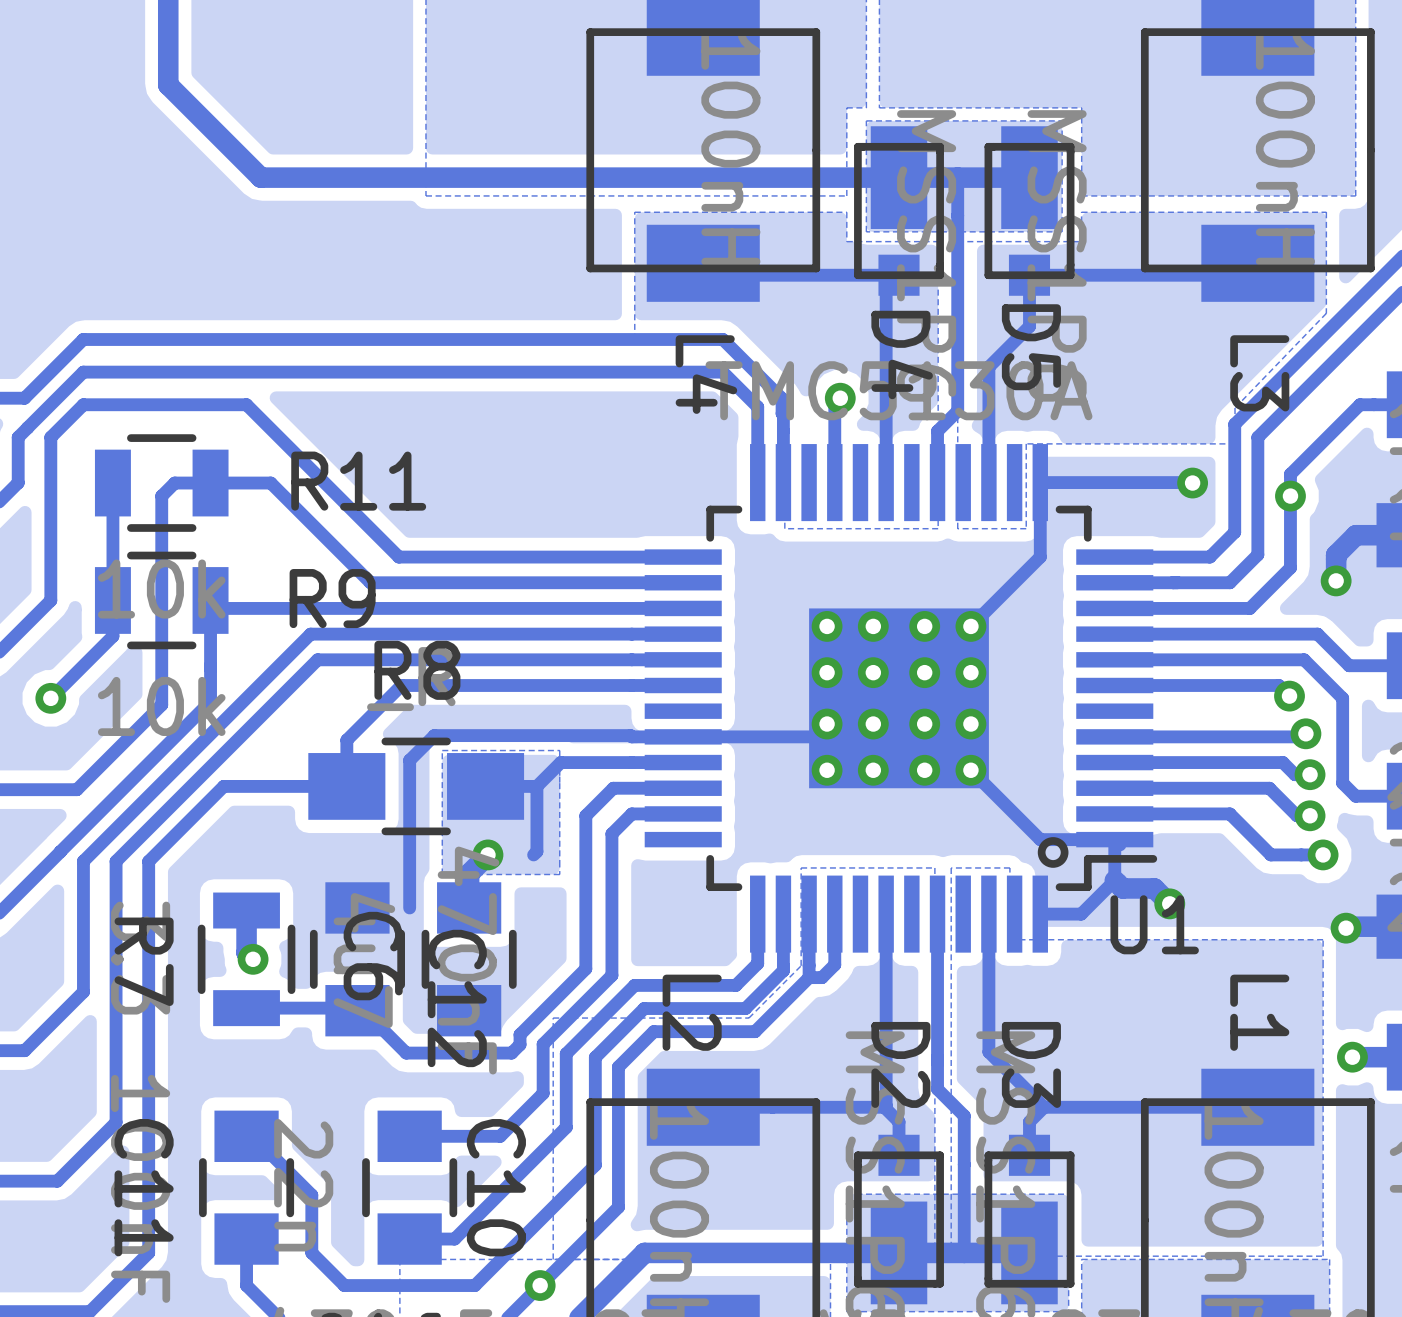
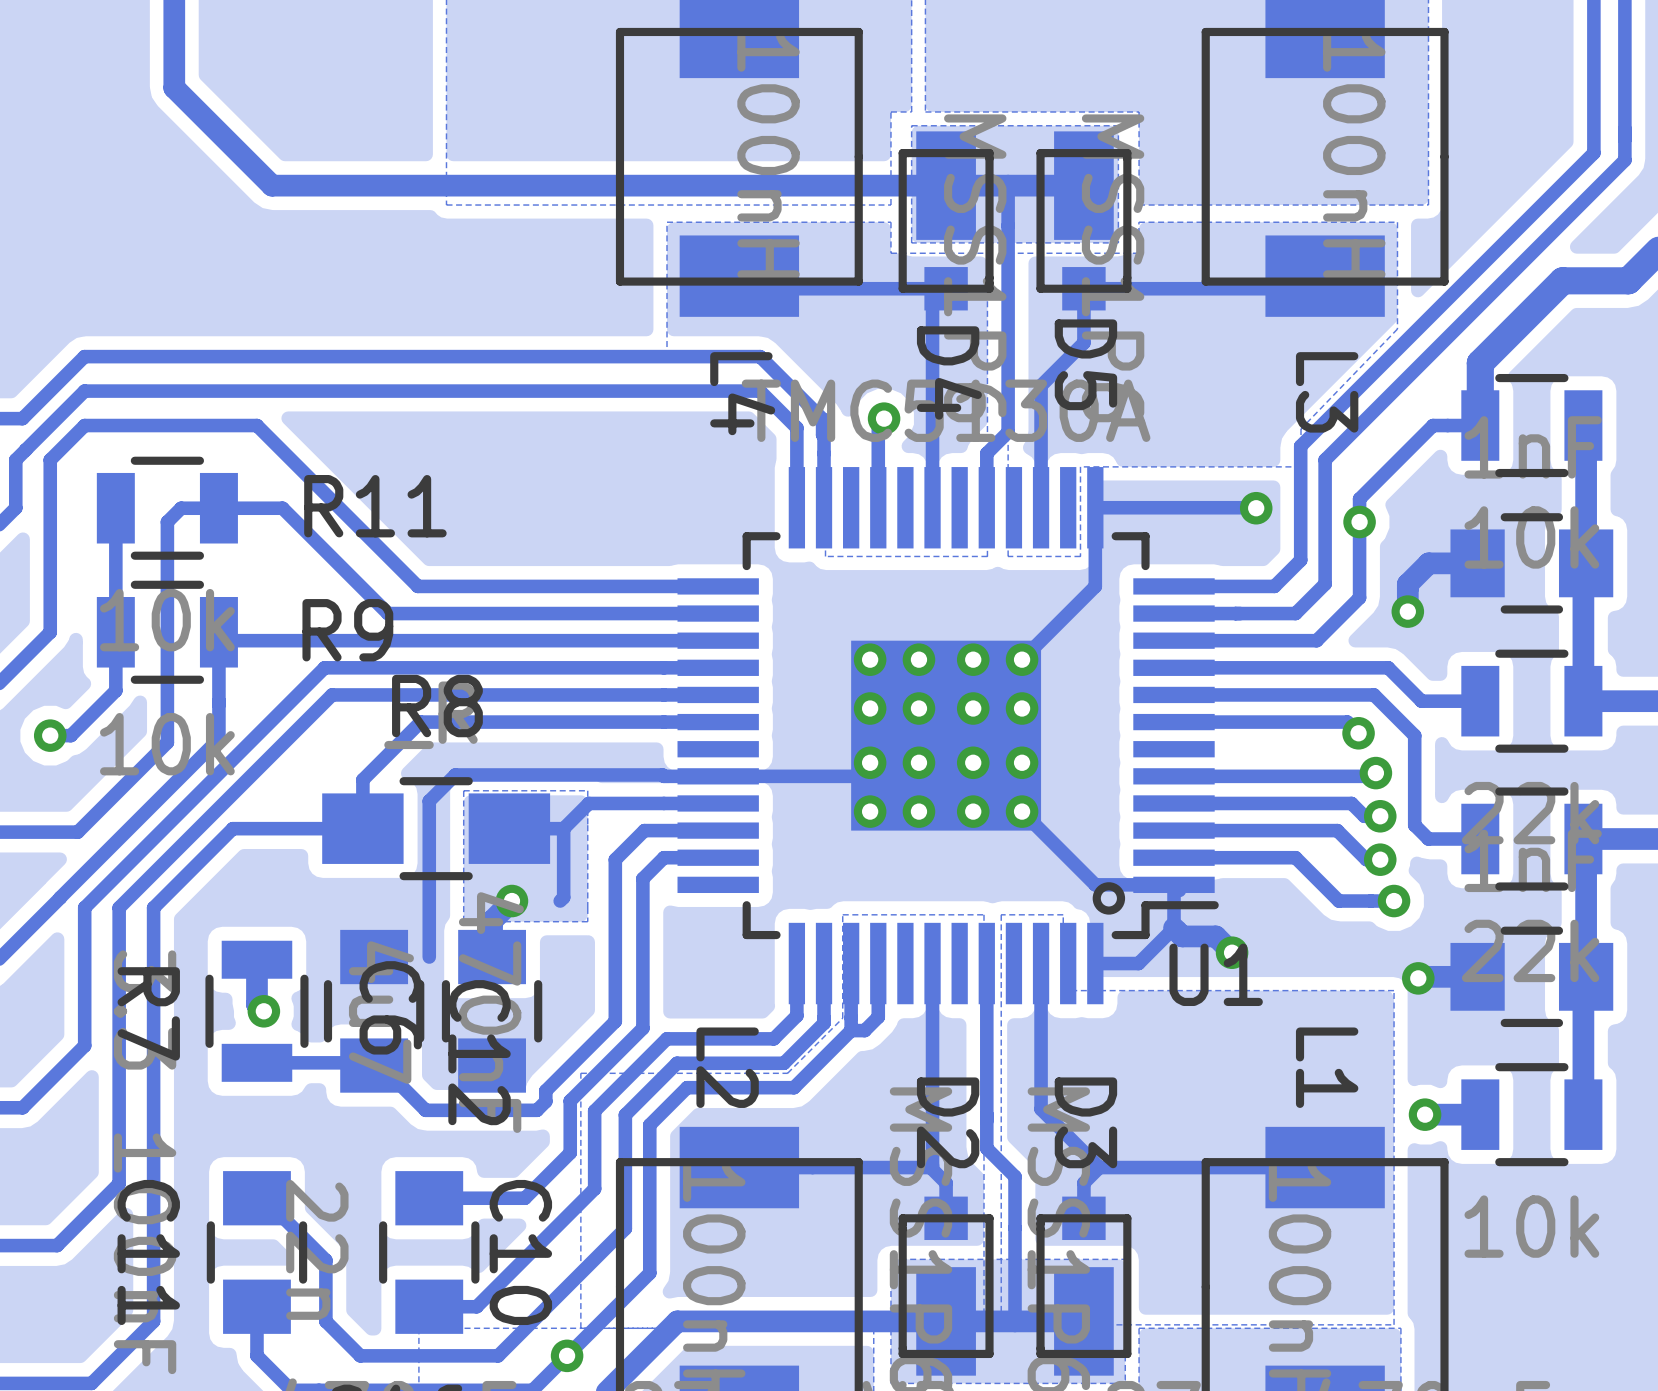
track: (112, 636) (50, 698) -> (115, 670) (115, 690) (70, 735) (50, 735)

